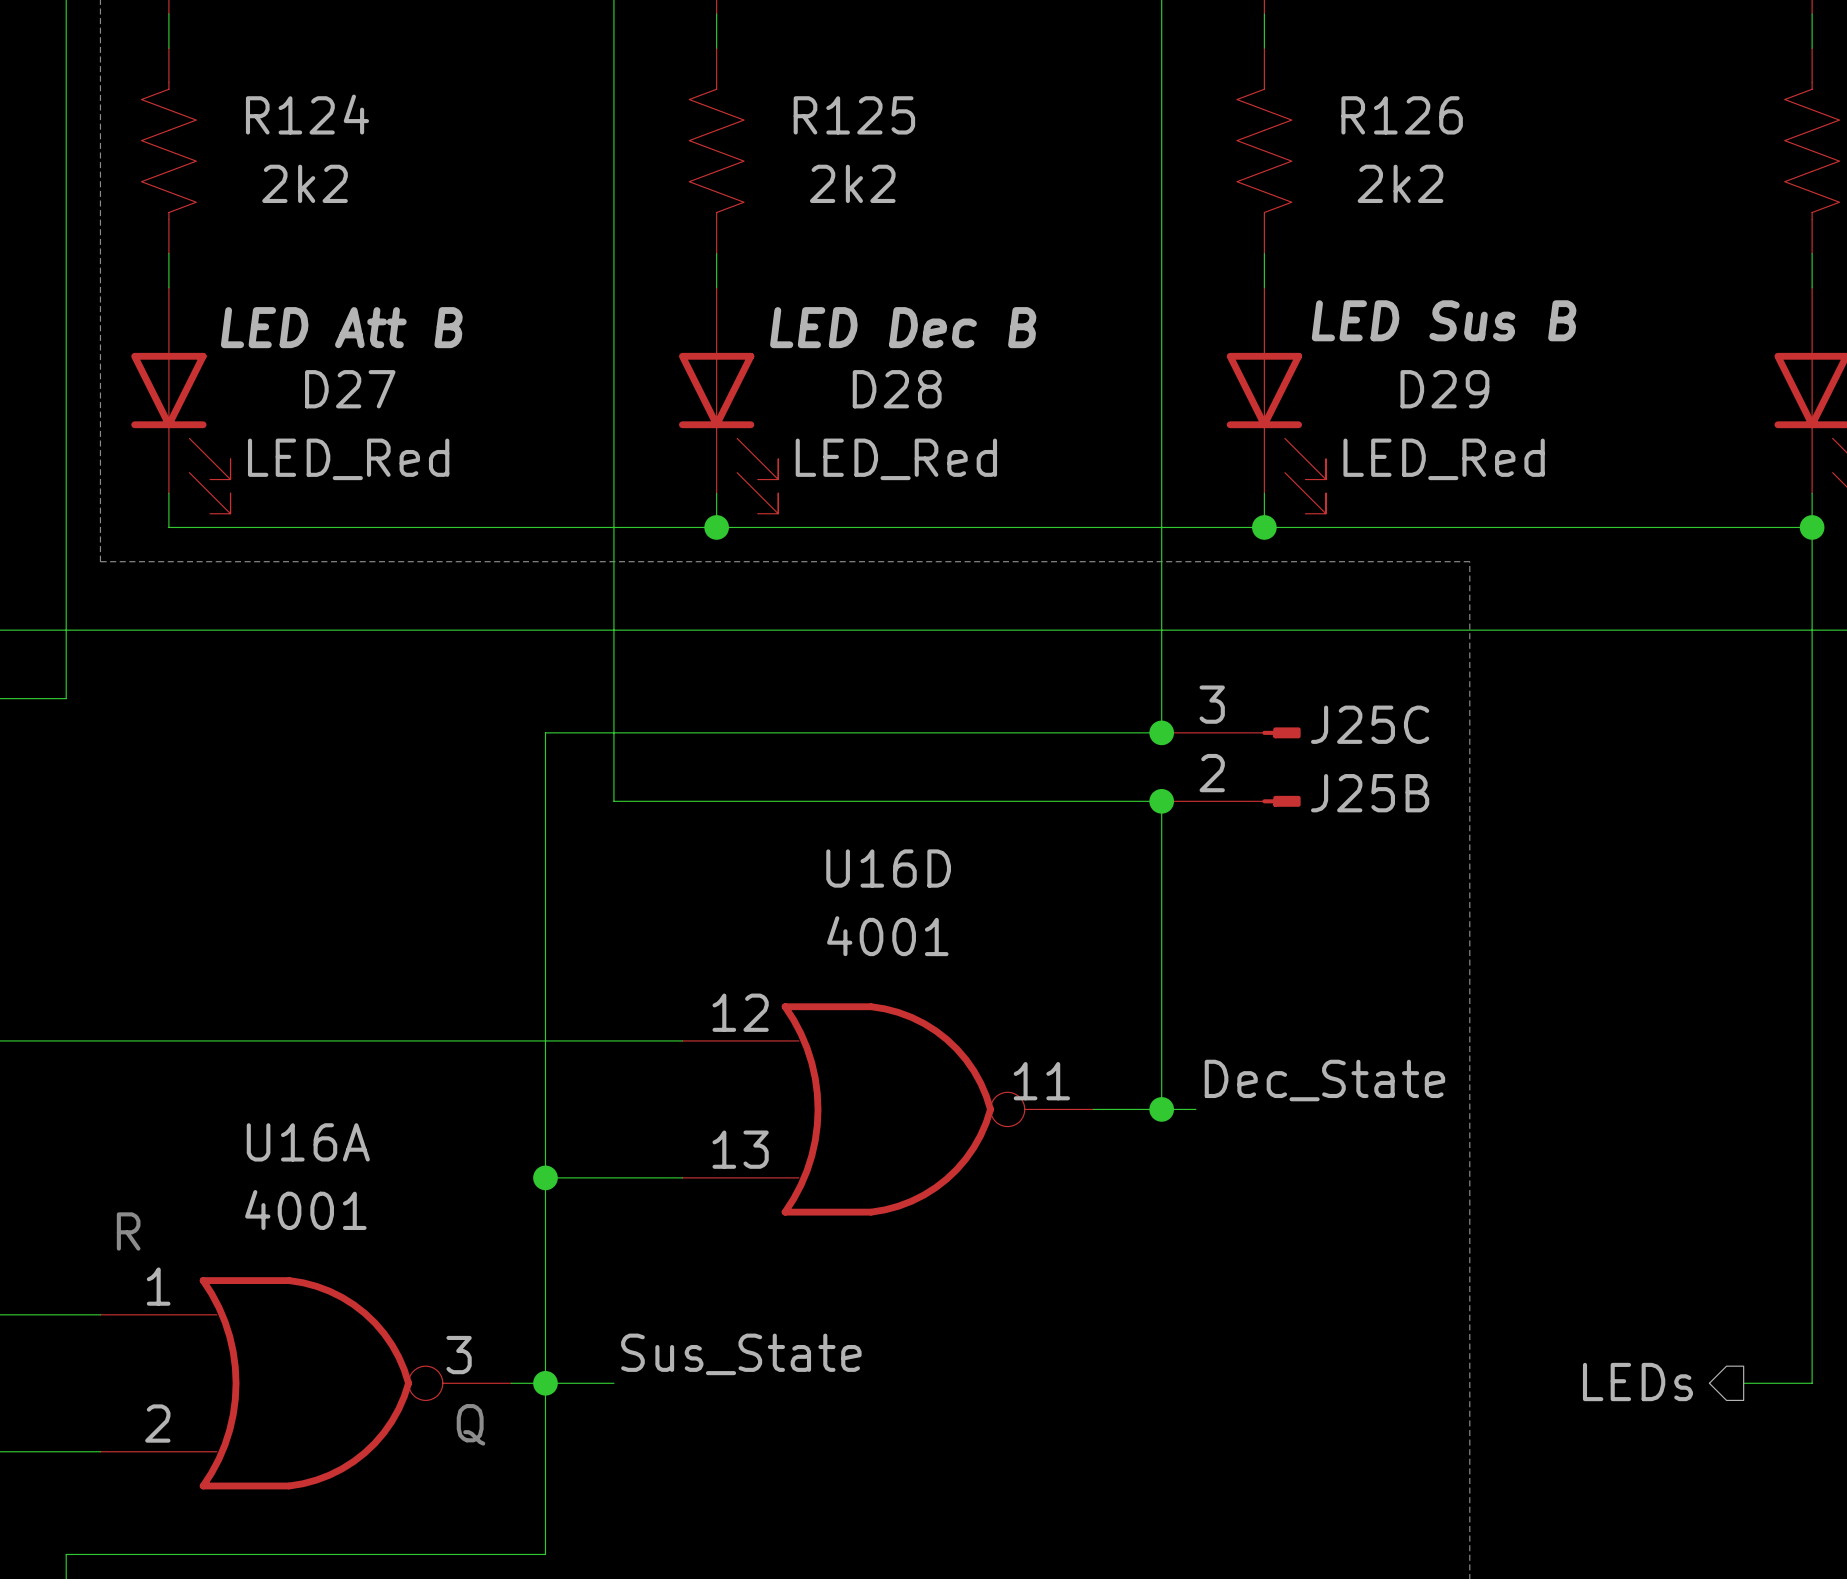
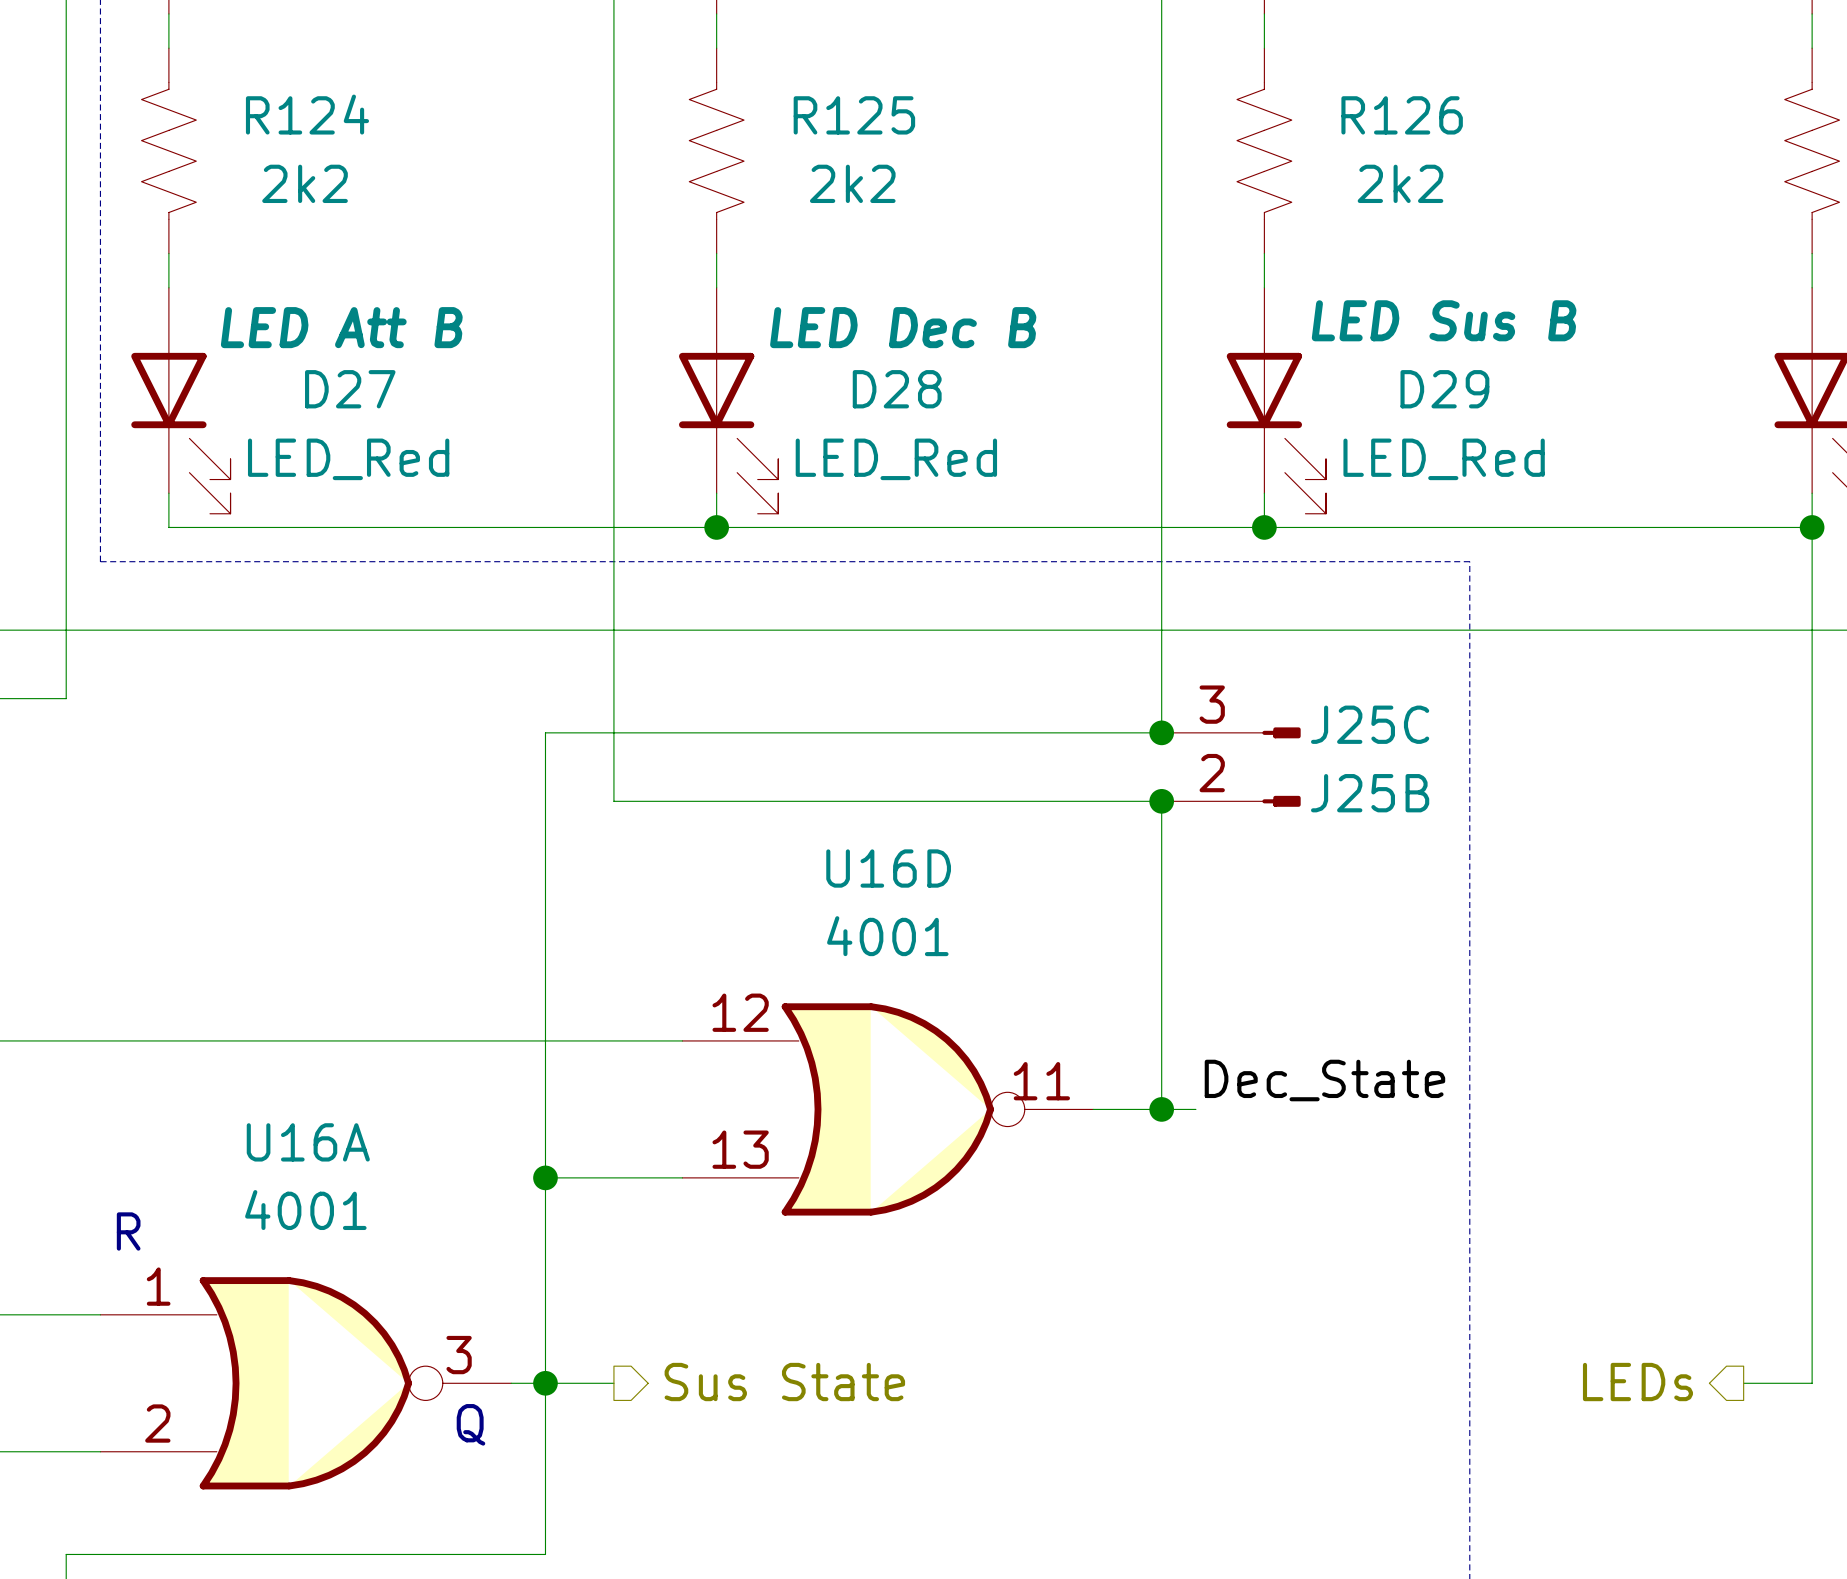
label: Sus_State (741, 1354) -> none
hierarchical label: none -> Sus State (784, 1382)

